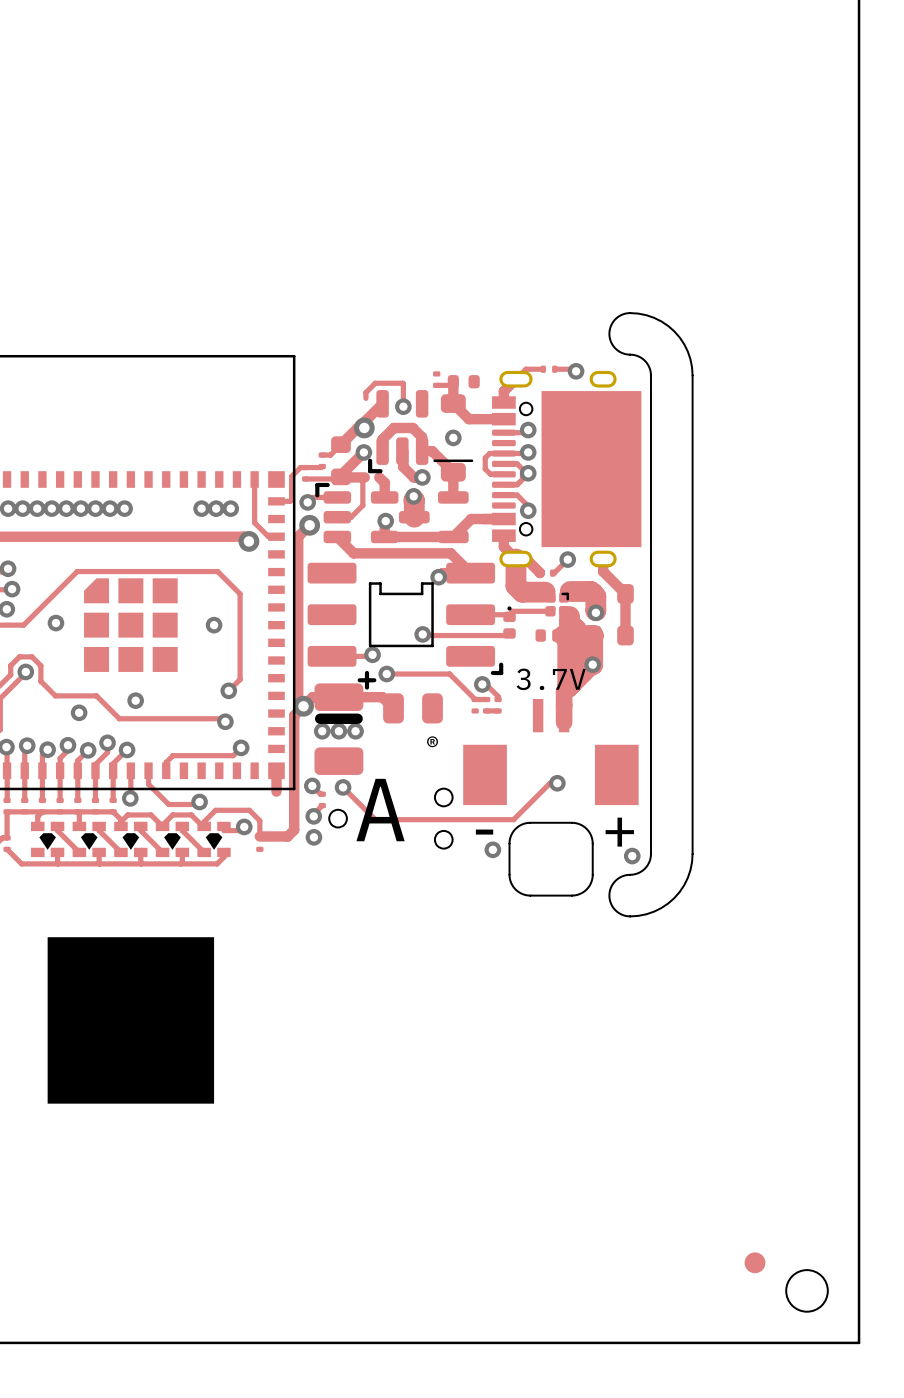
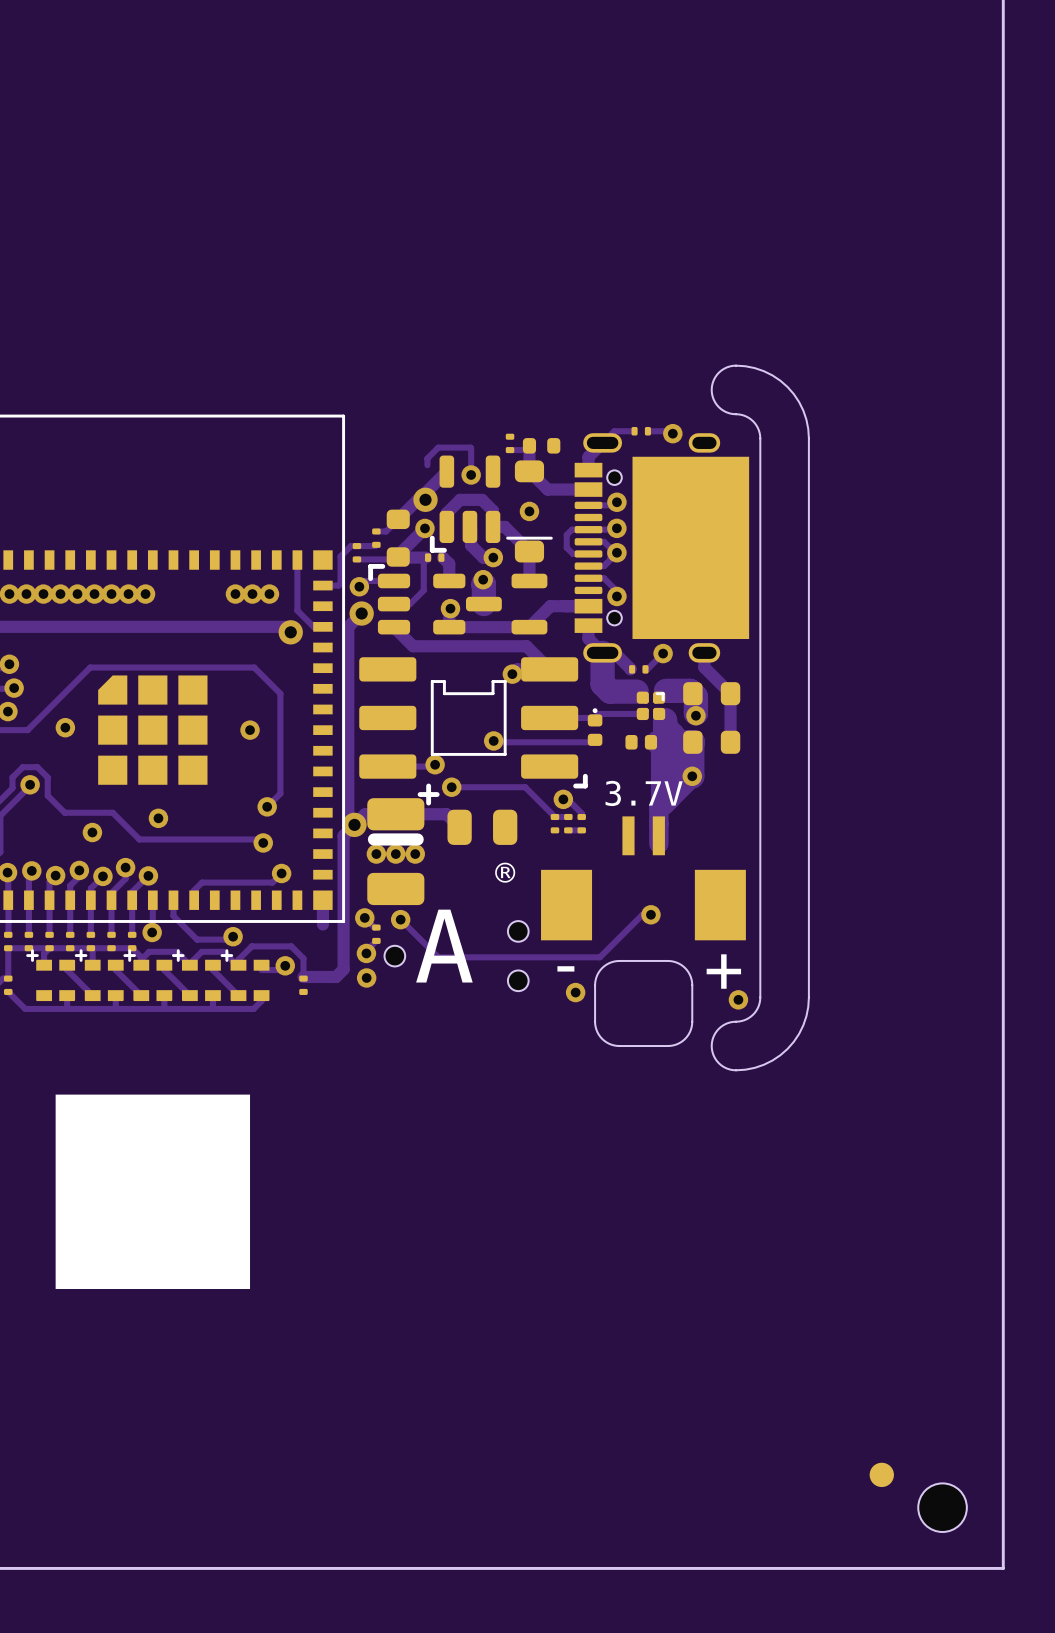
part footprint: [30, 821, 65, 858] -> [26, 949, 76, 1002]
part footprint: [72, 821, 106, 858] -> [74, 949, 124, 1002]
part footprint: [114, 821, 148, 858] -> [123, 949, 173, 1002]
part footprint: [155, 821, 190, 858] -> [171, 949, 221, 1002]
part footprint: [197, 821, 231, 858] -> [220, 949, 270, 1002]

